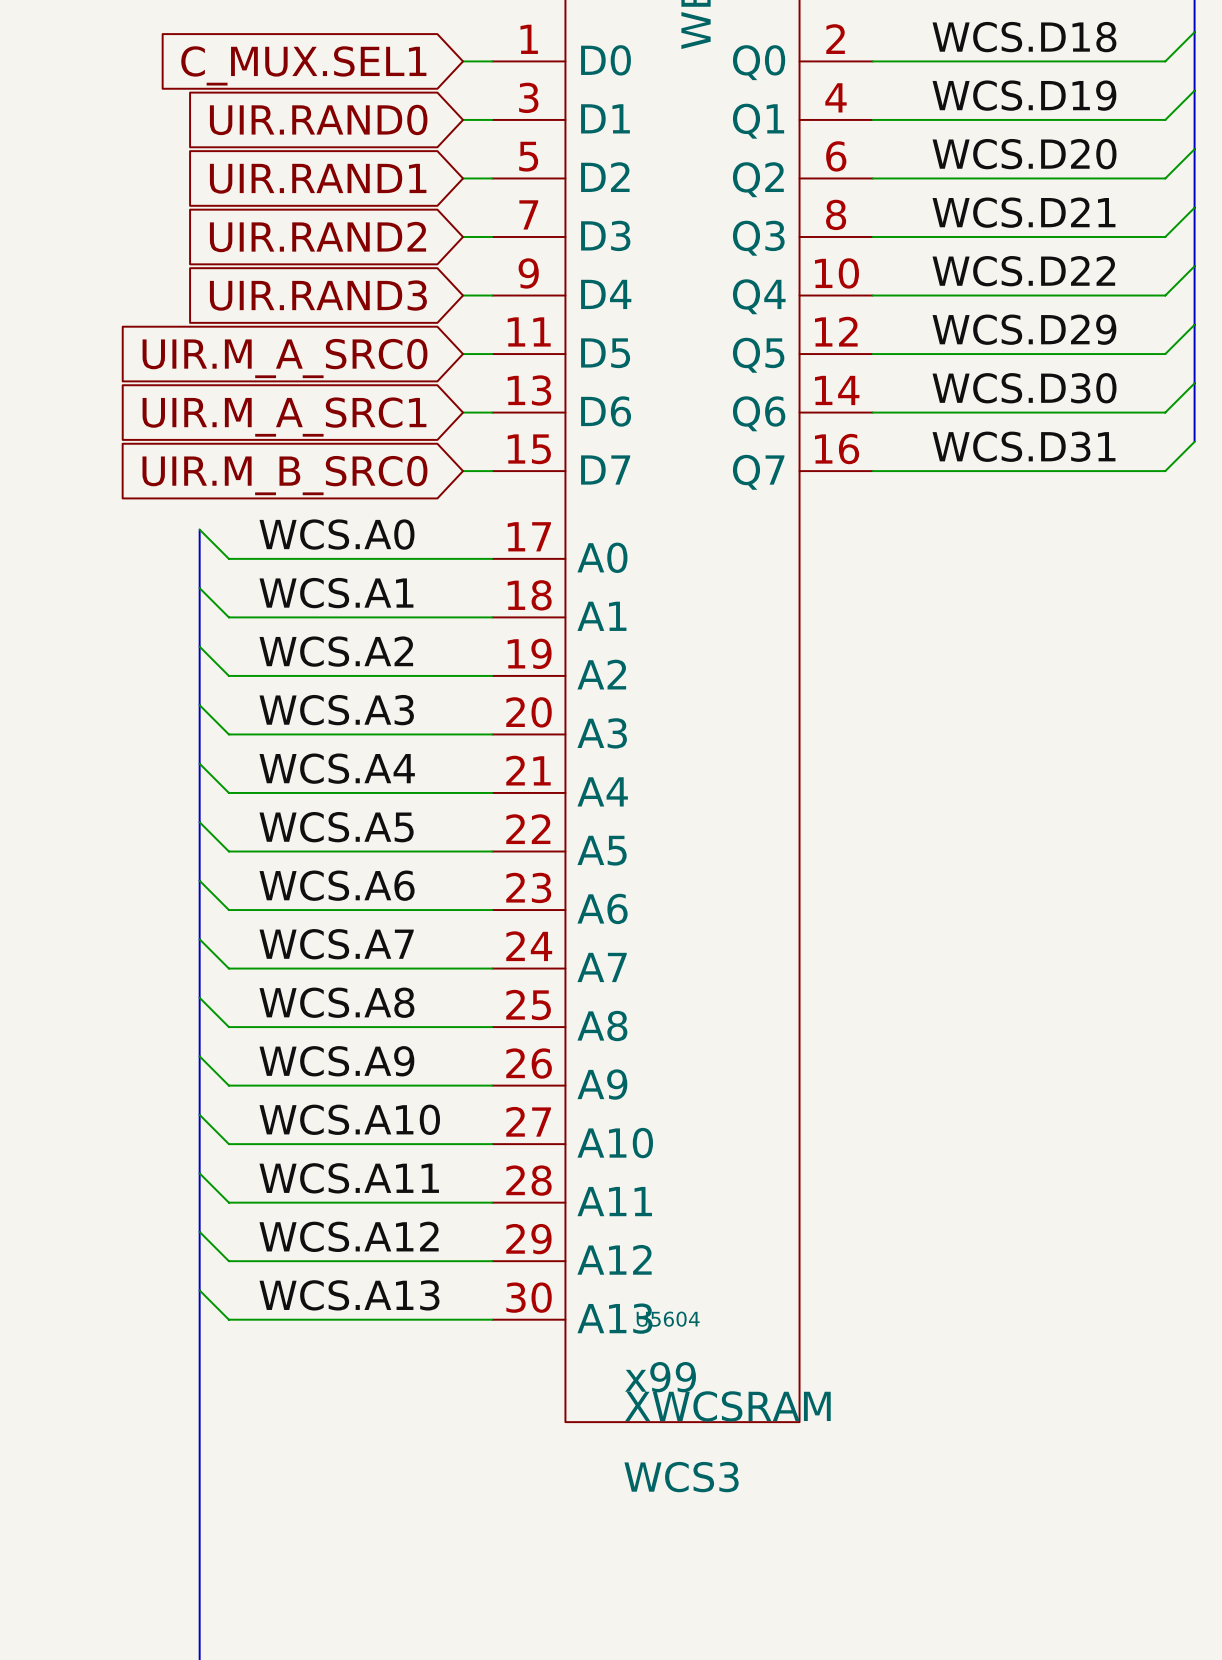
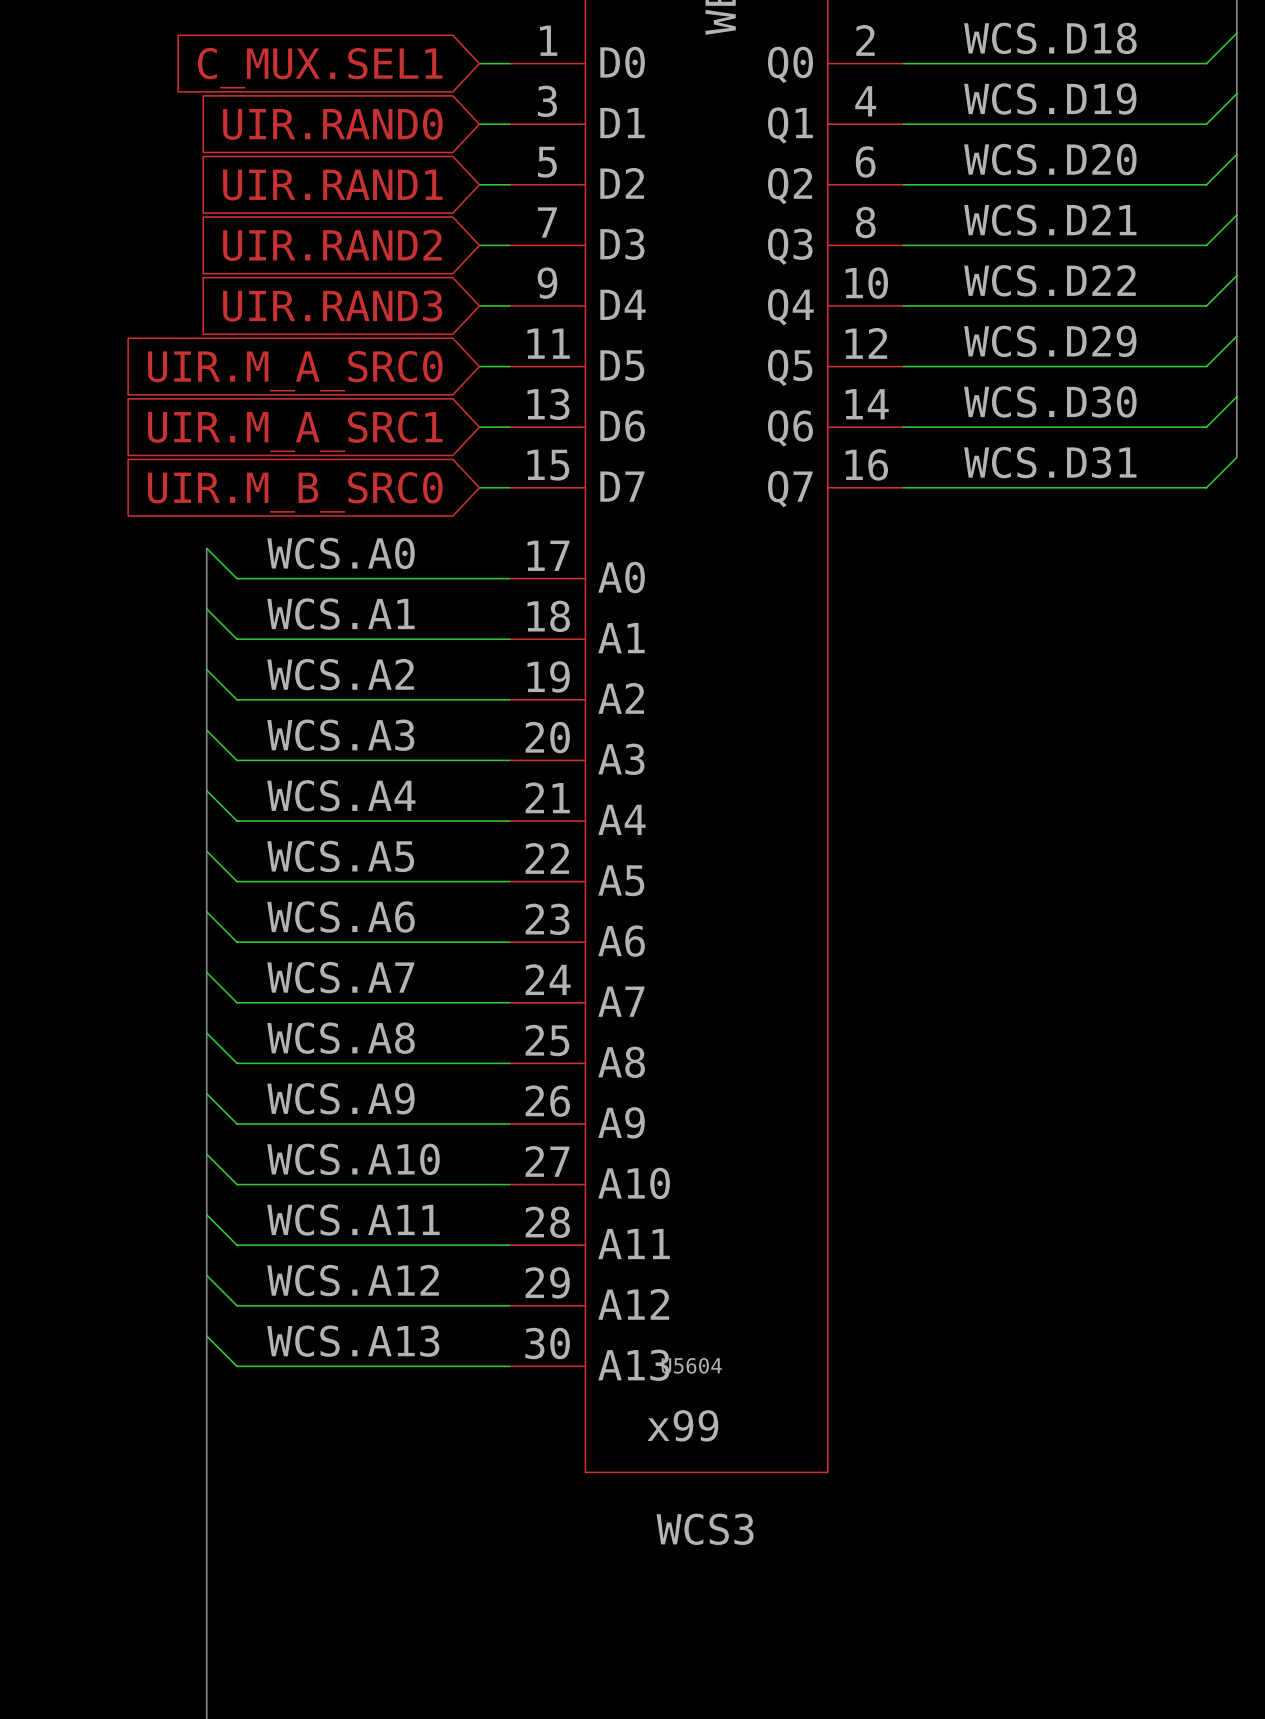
U5604 value: XWCSRAM (727, 1406) -> none

